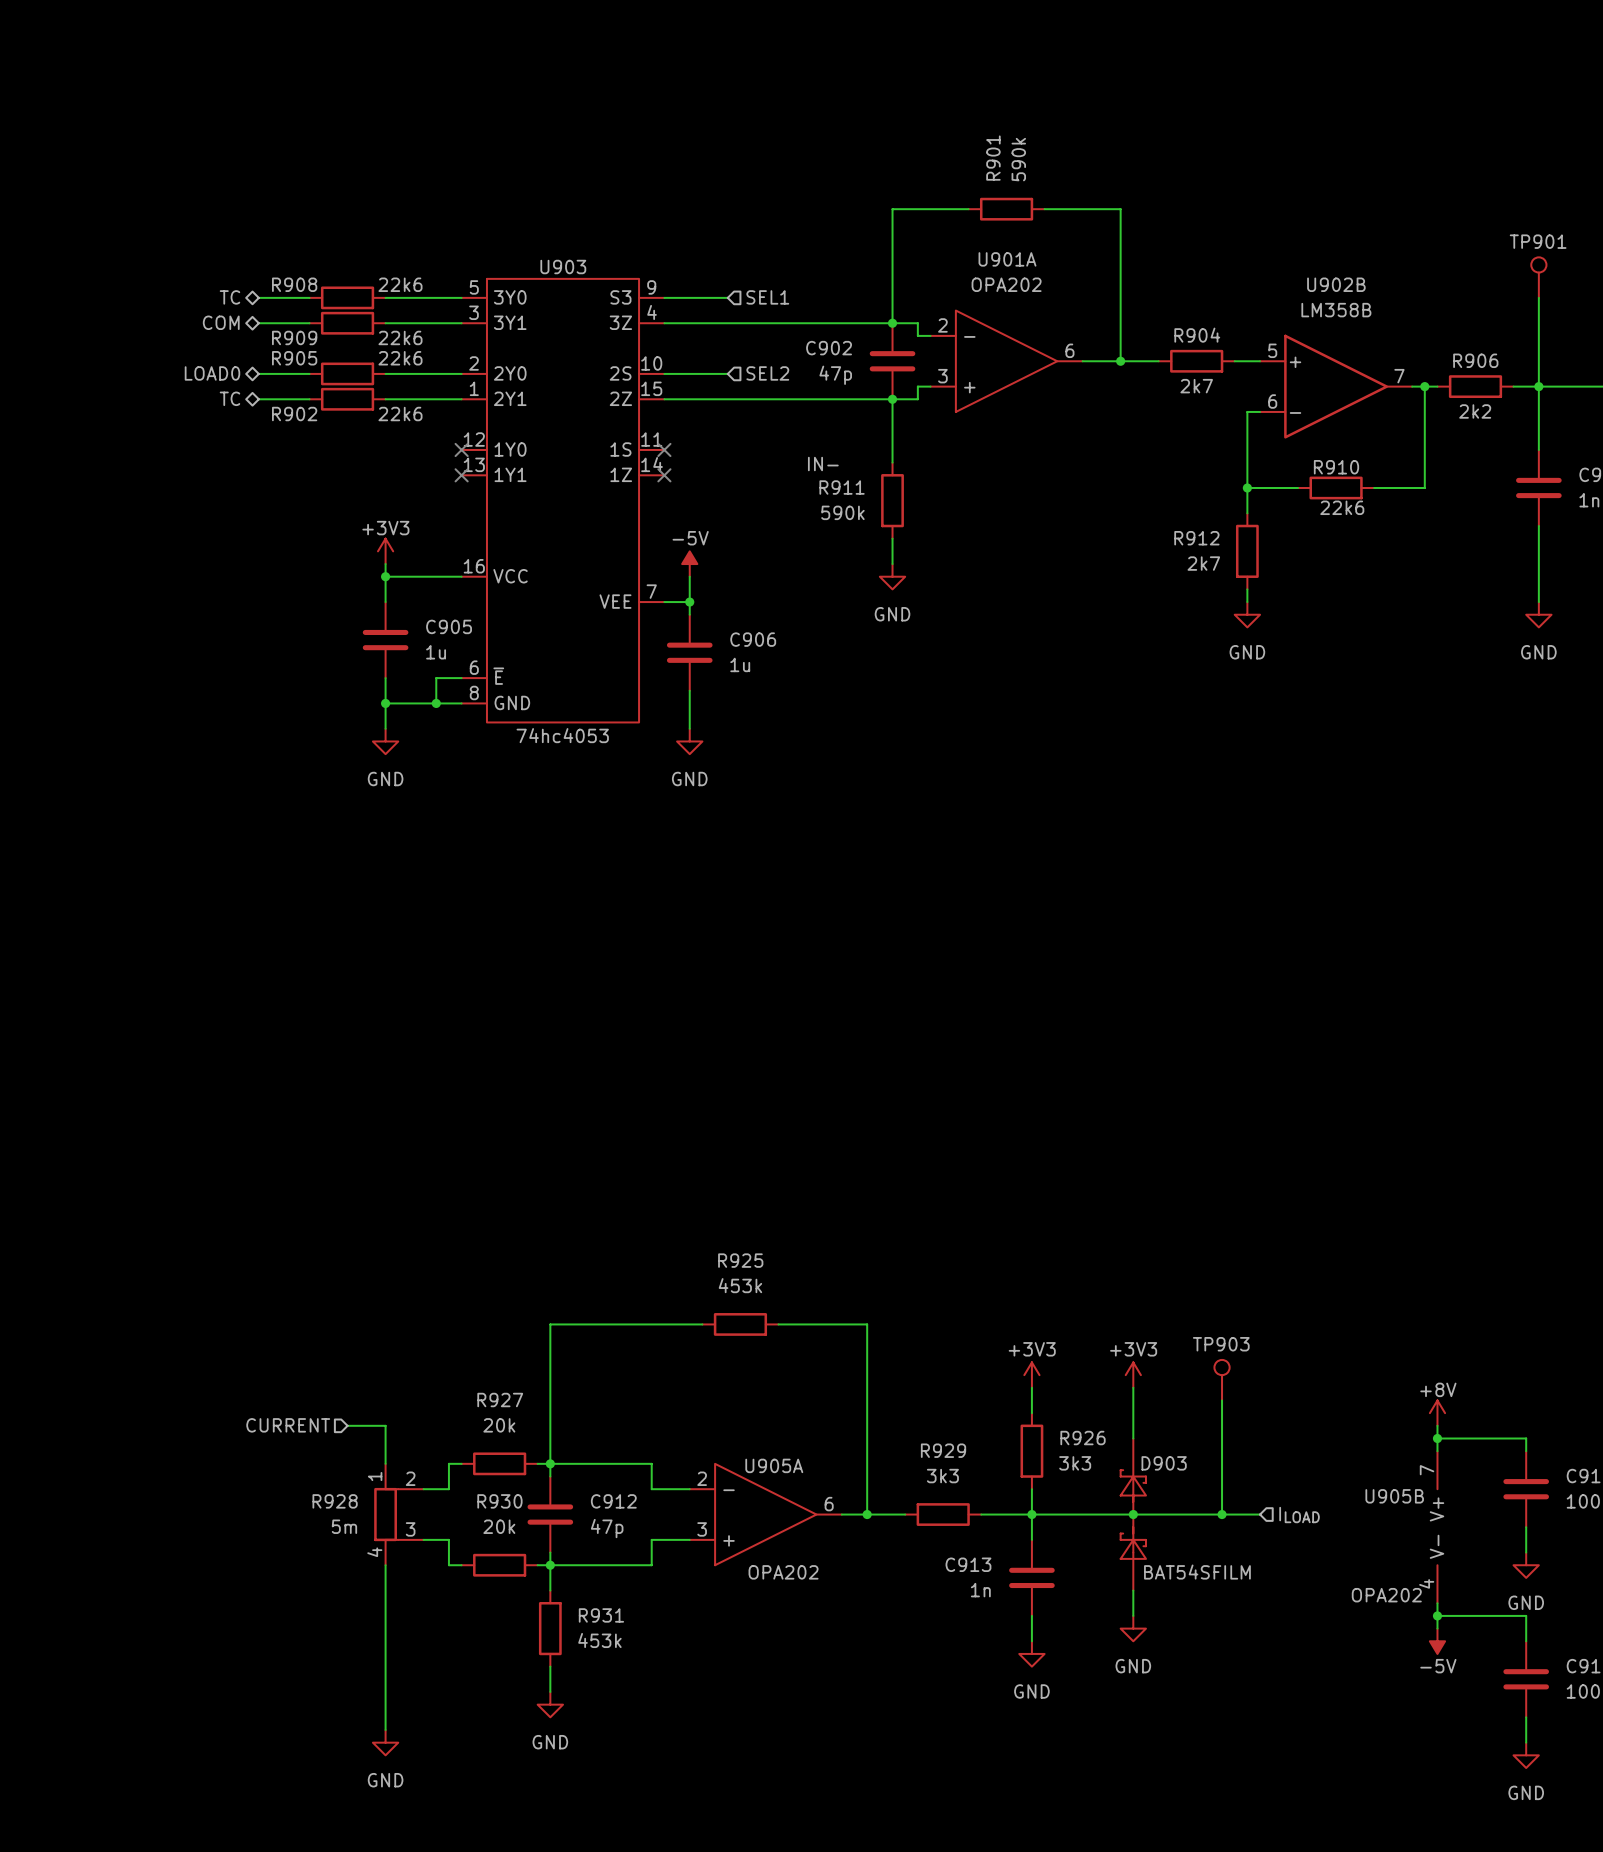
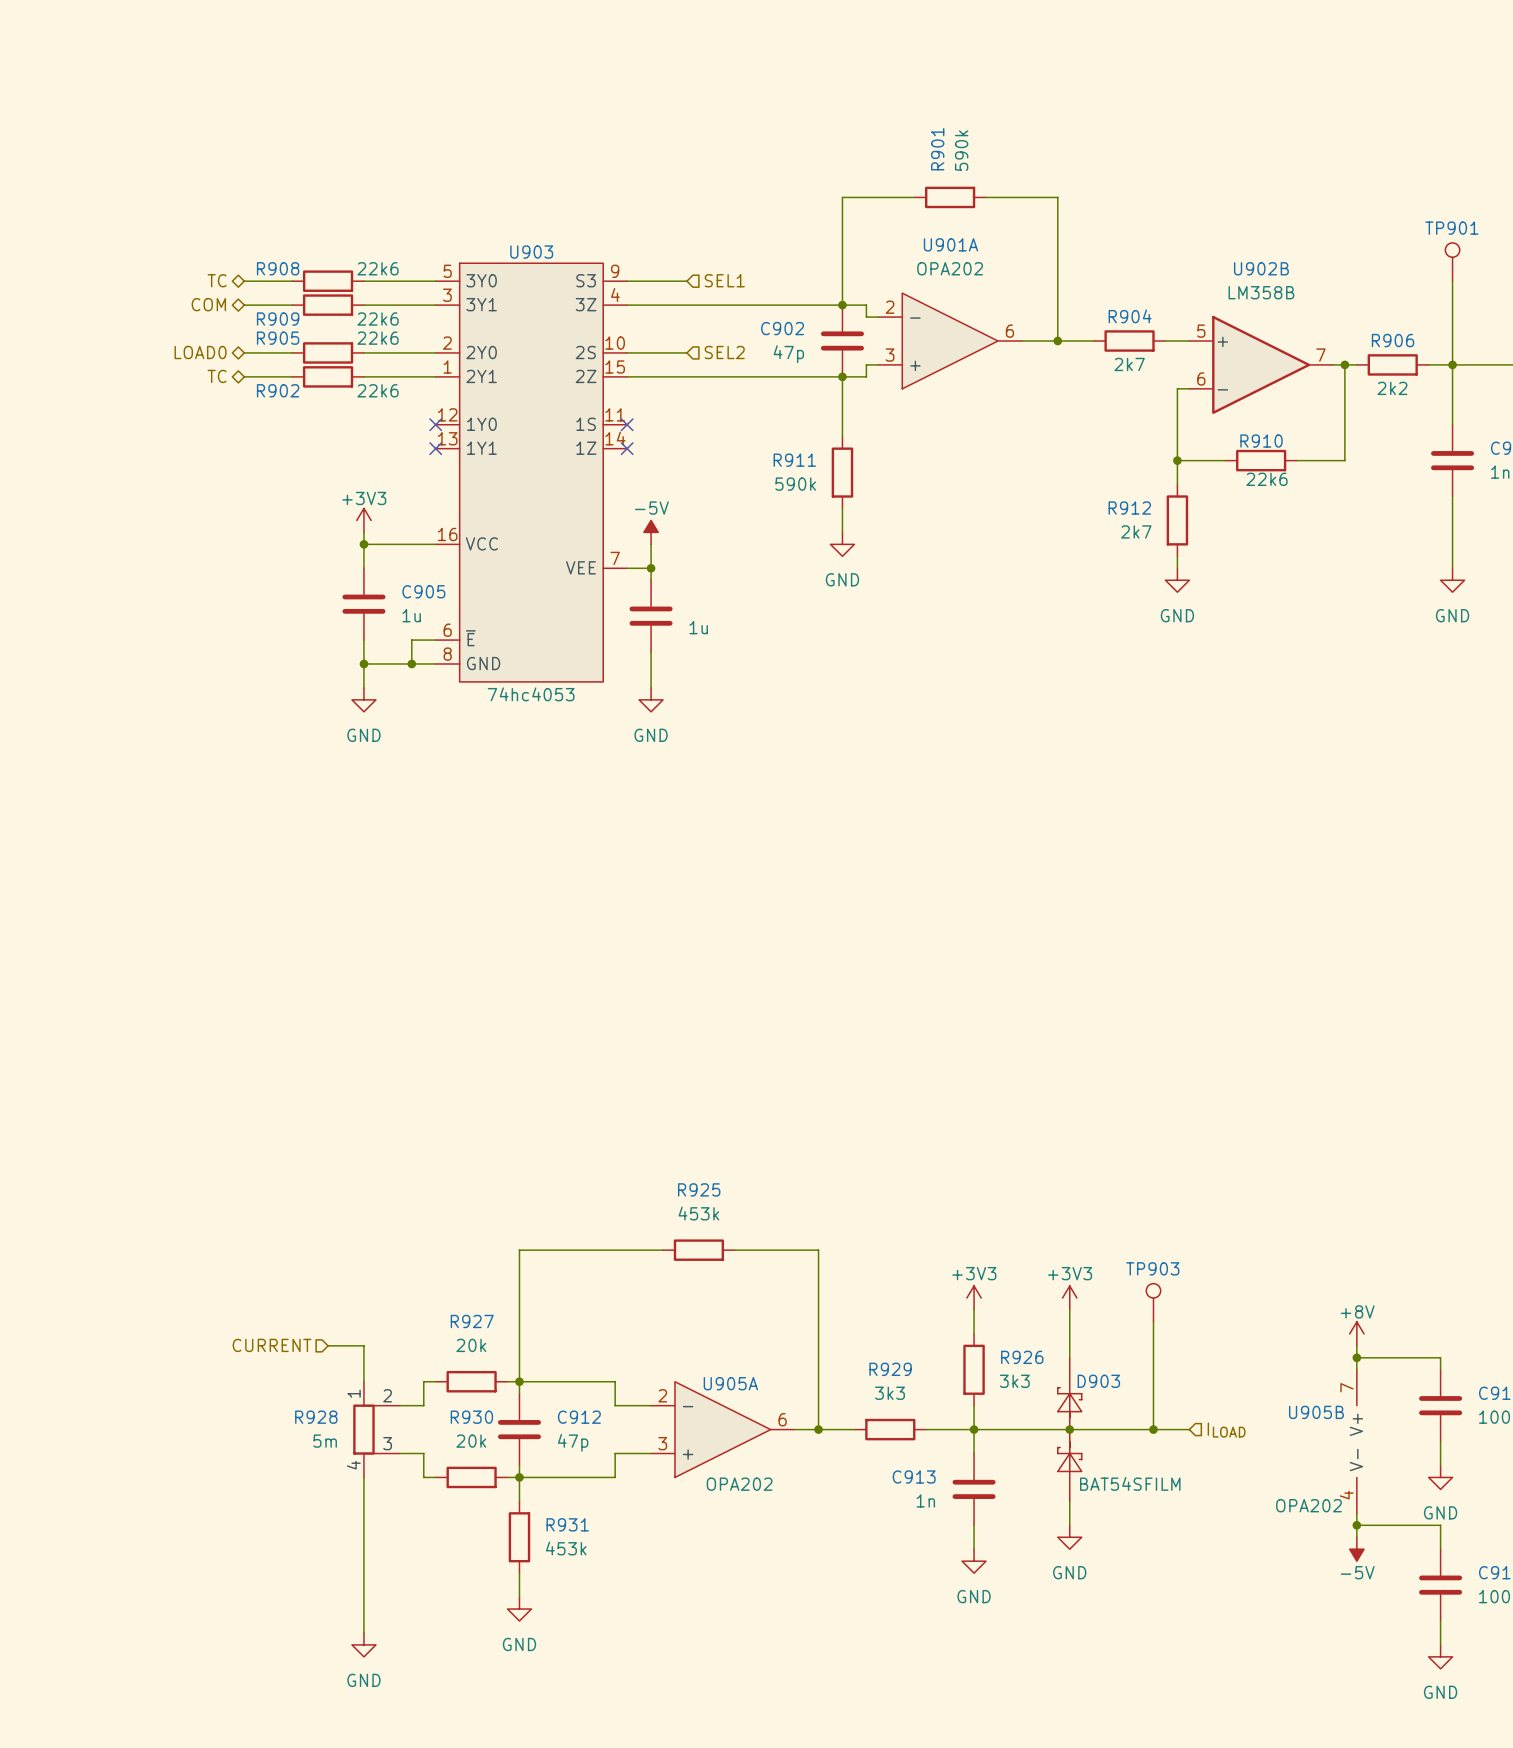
label: IN- (823, 464) -> none
C906 name: C906 (753, 639) -> none

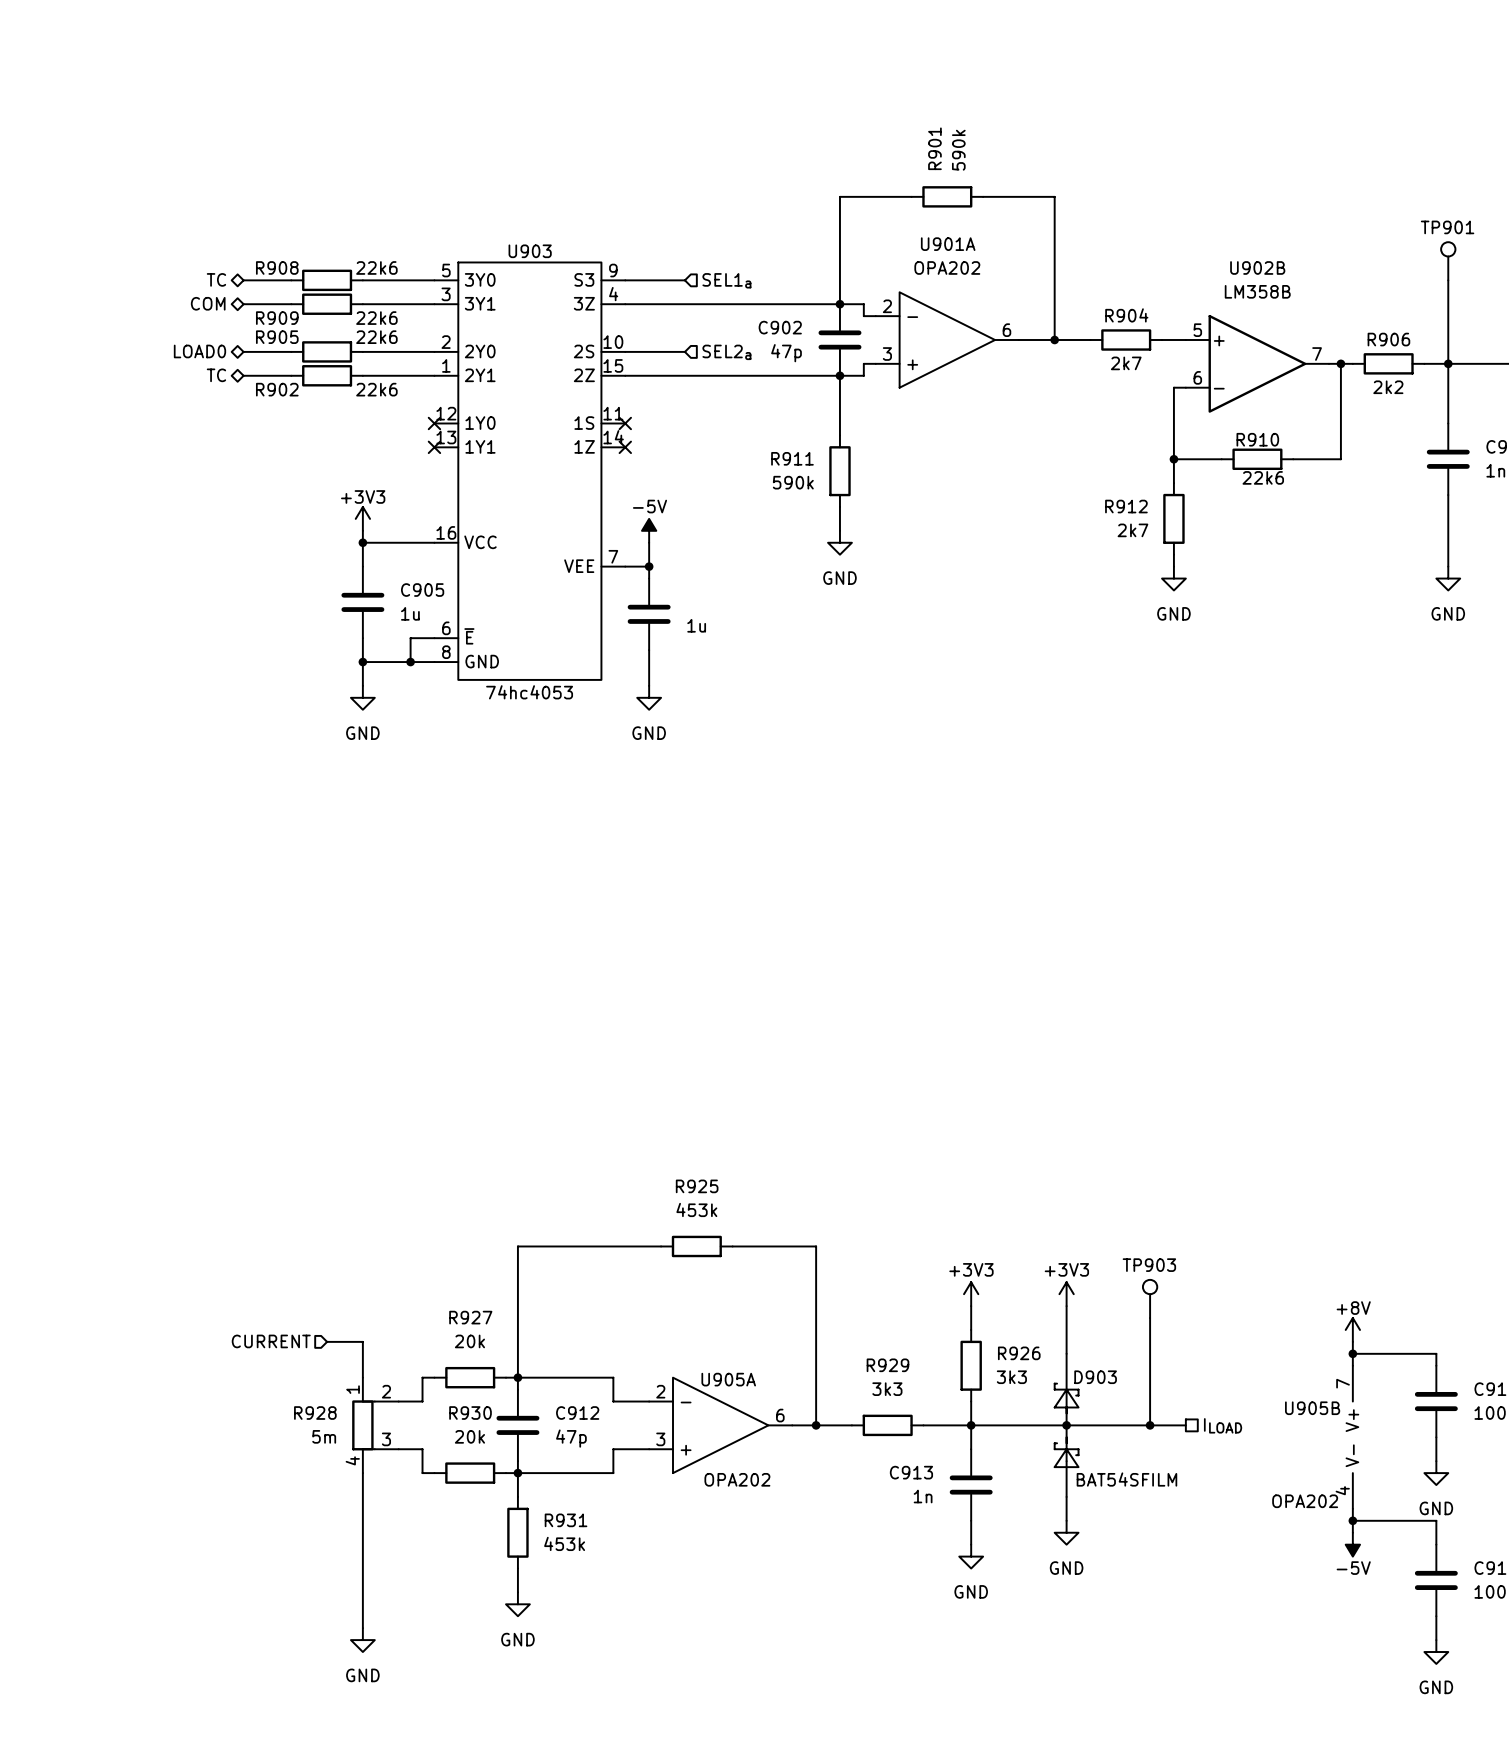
hierarchical label: SEL1 (724, 280) -> SEL1a (726, 280)
hierarchical label: SEL2 (724, 352) -> SEL2a (726, 352)
hierarchical label shape: input (1226, 1430) -> passive (1223, 1425)

